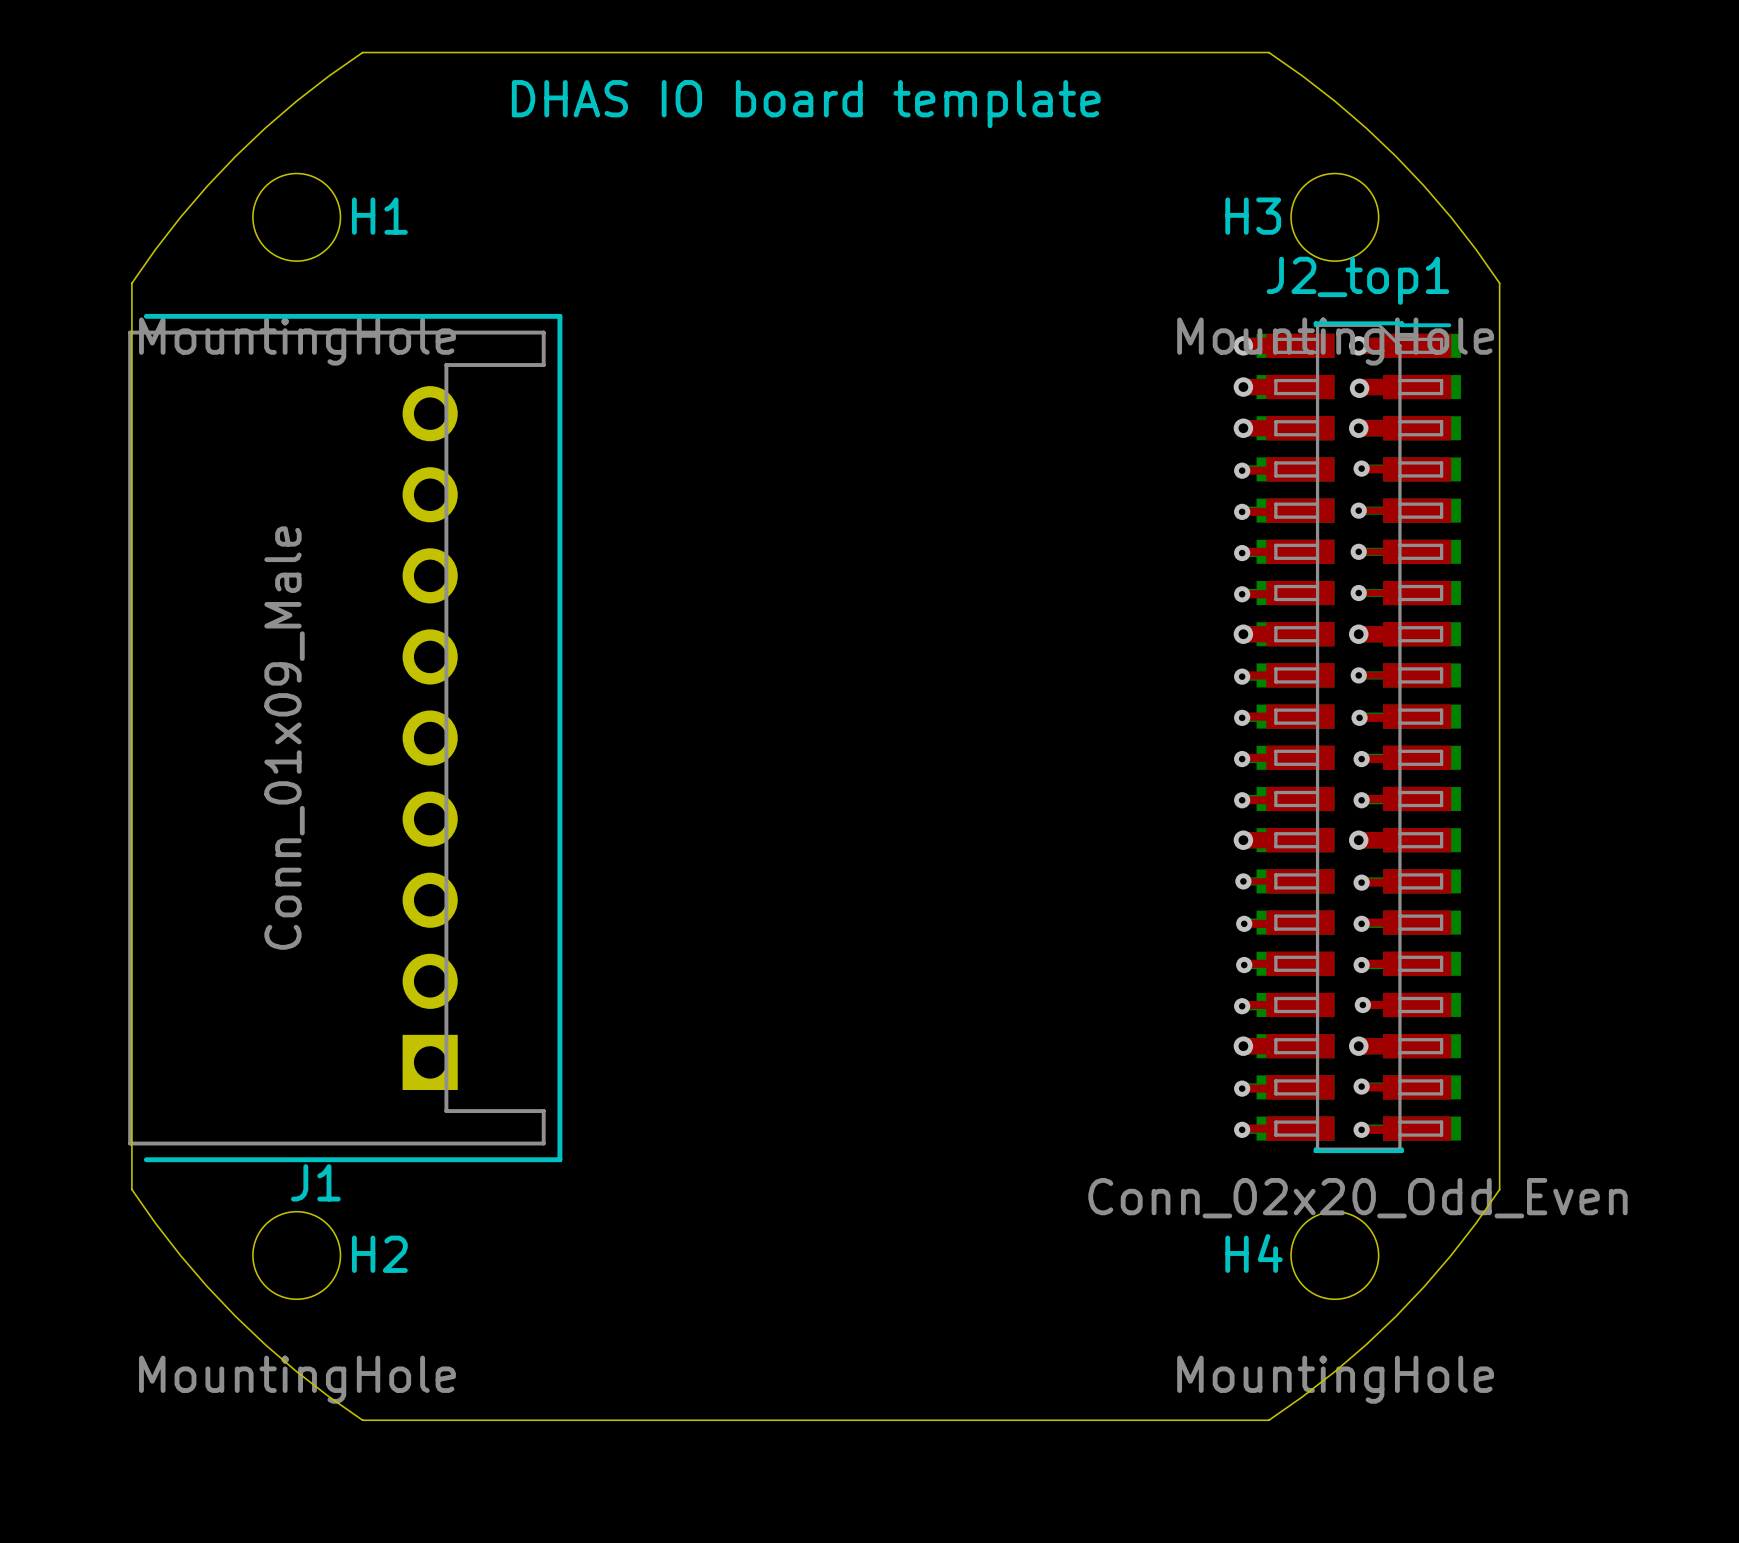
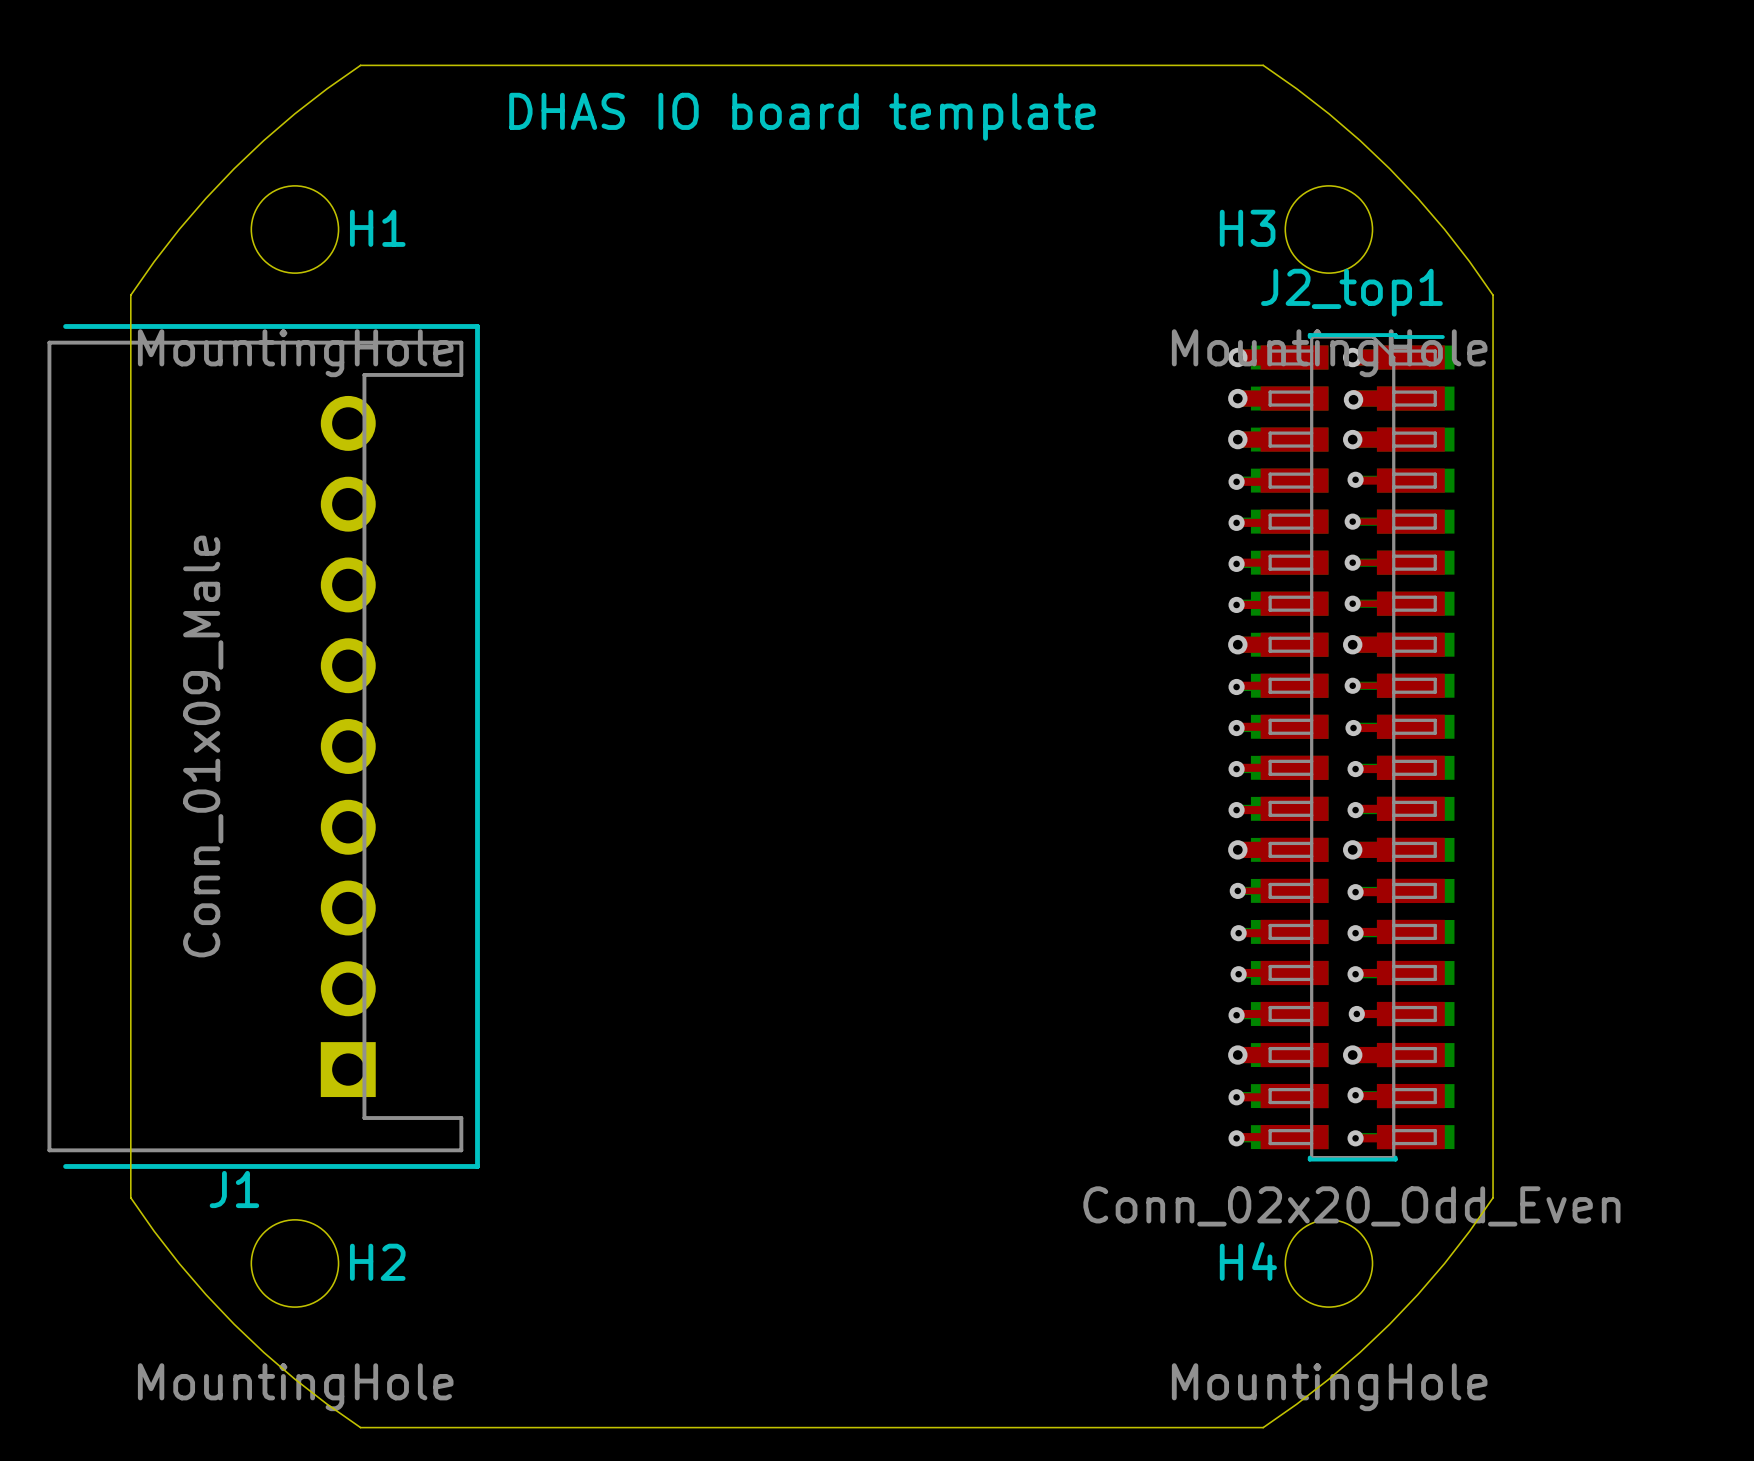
J1 footprint: [128, 313, 563, 1163] -> [47, 324, 480, 1169]

